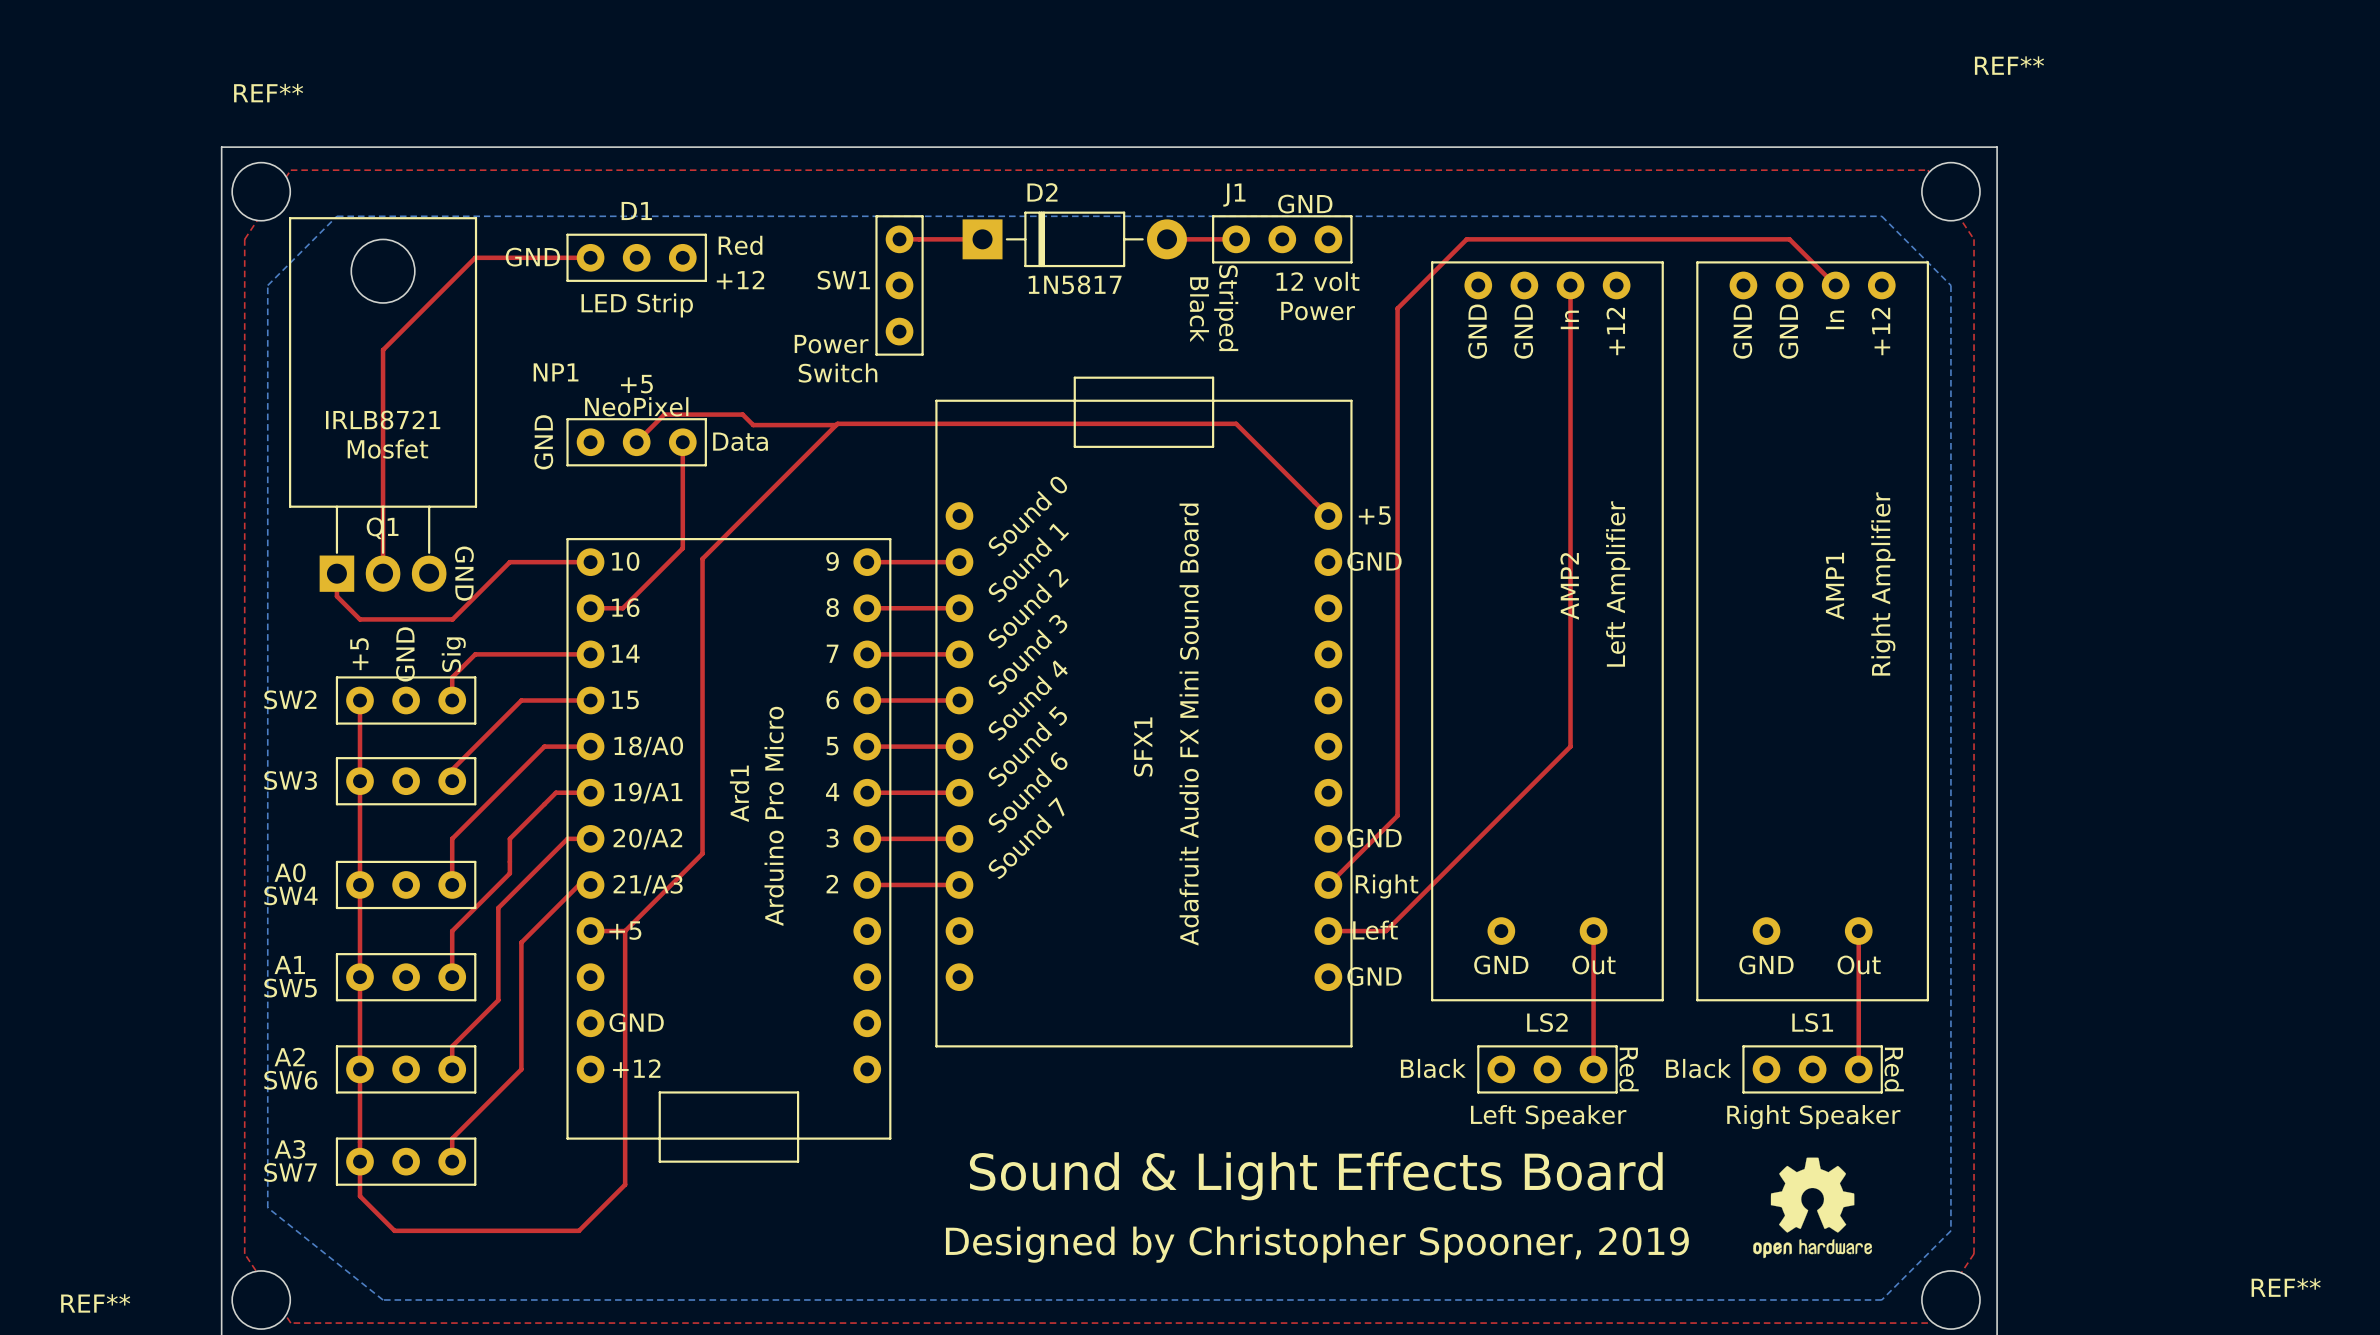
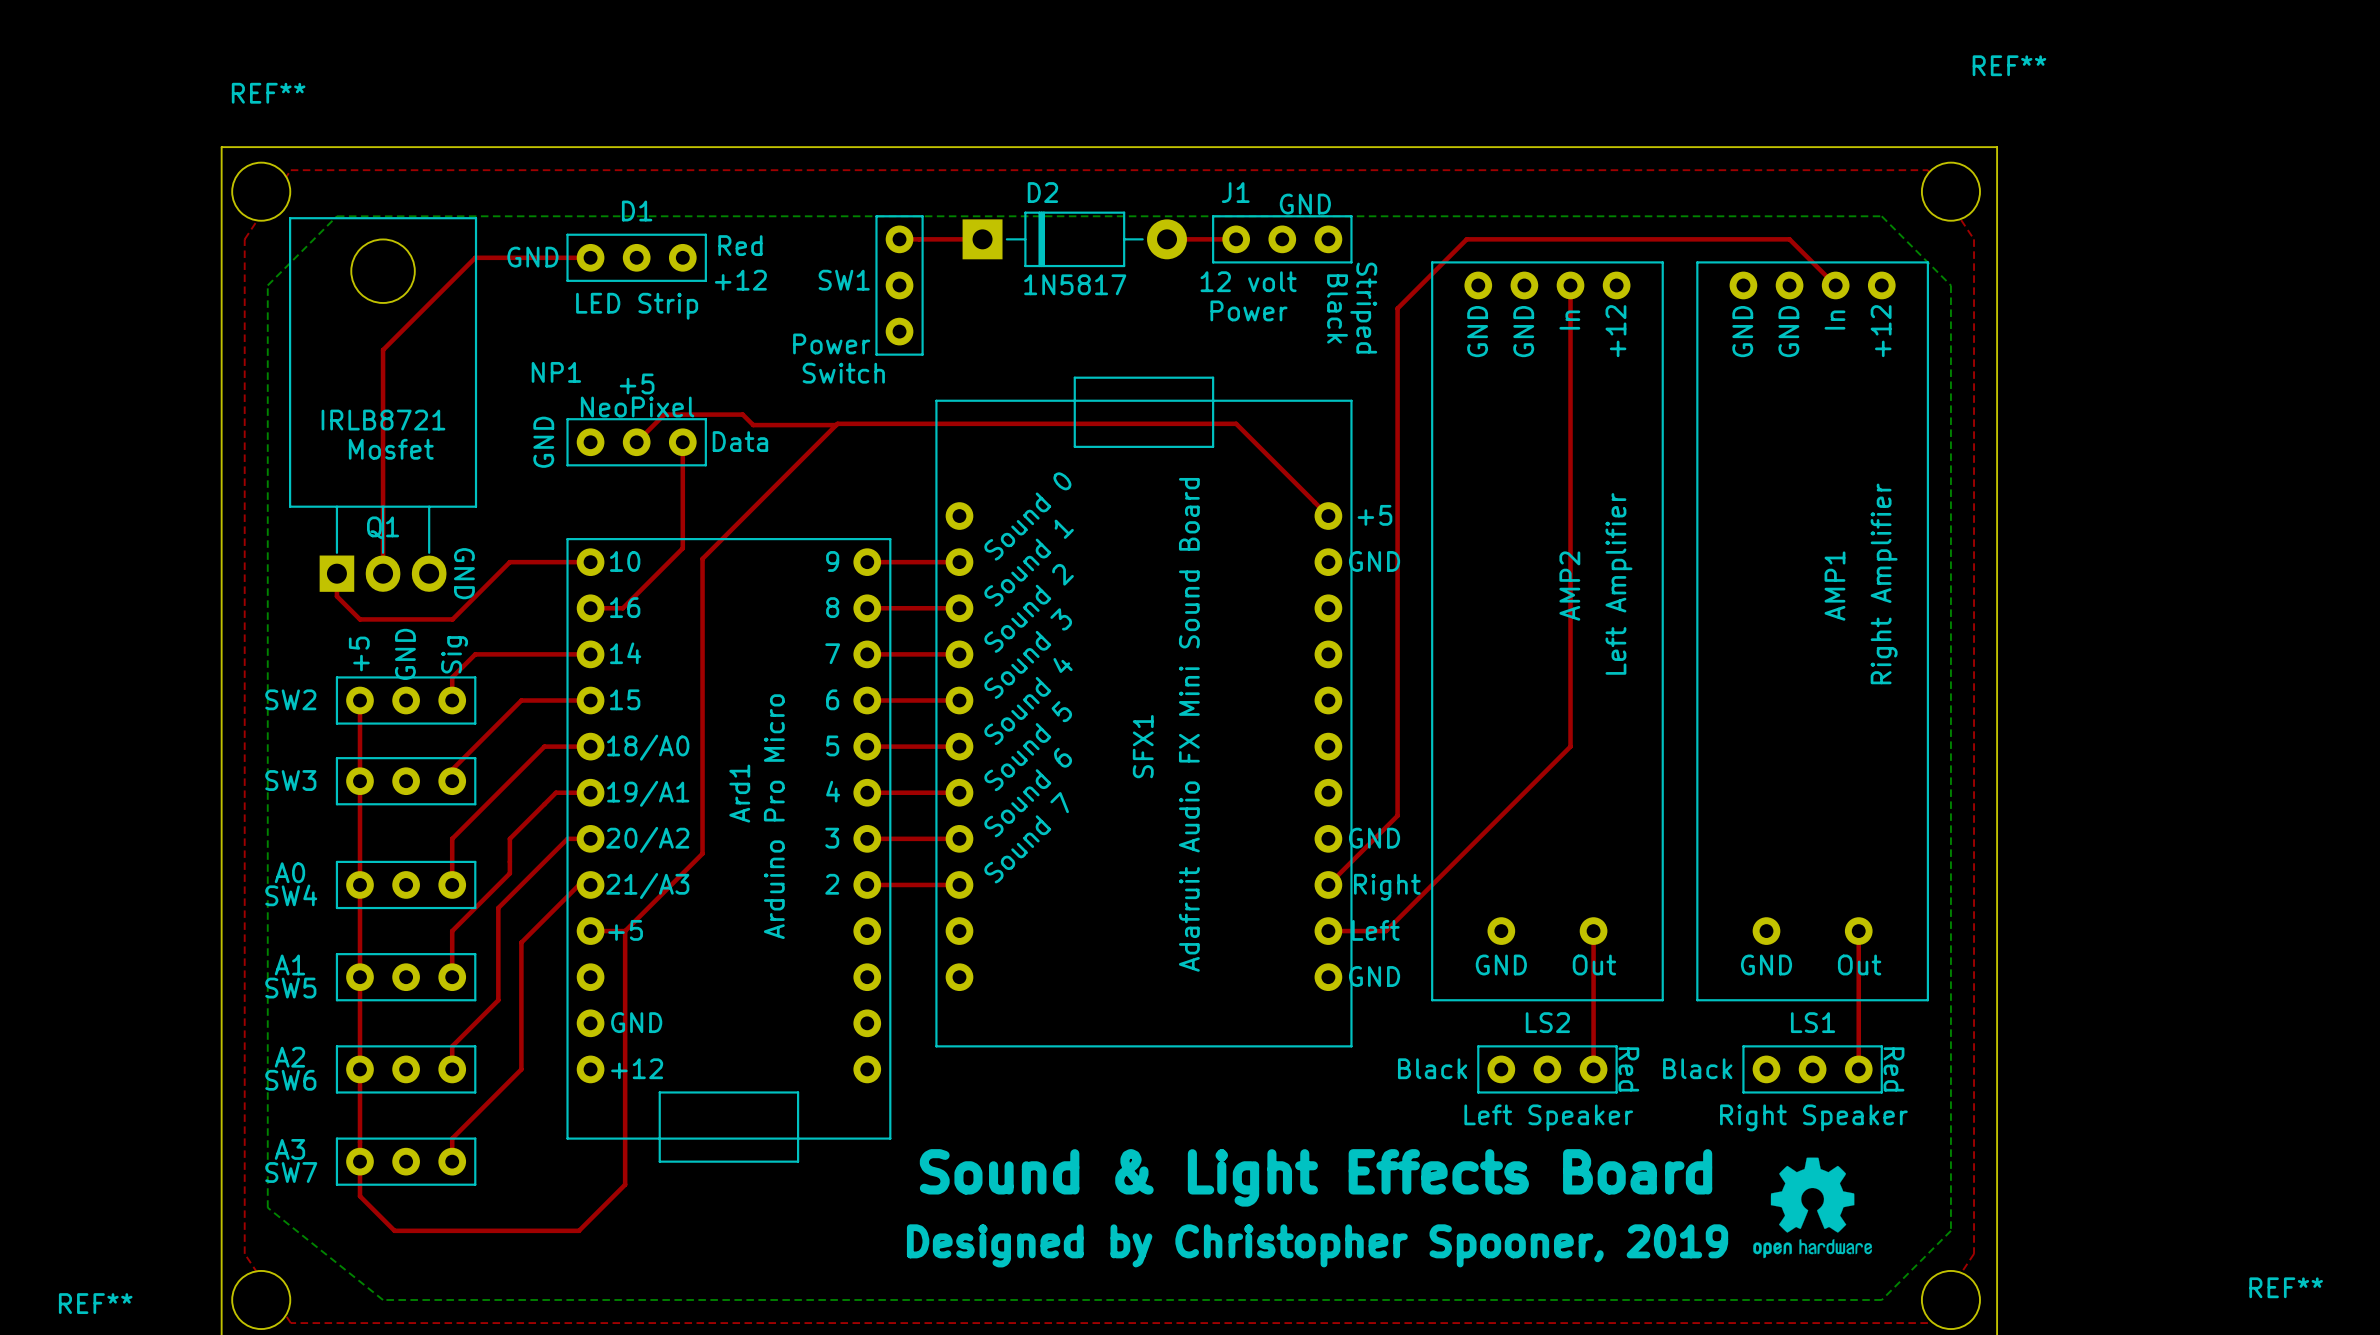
text position: 12 volt (1317, 281) -> 12 volt (1248, 281)
text position: Striped (1226, 308) -> Striped (1363, 308)
text position: Black (1199, 309) -> Black (1337, 308)
text position: Power (1318, 311) -> Power (1249, 310)

